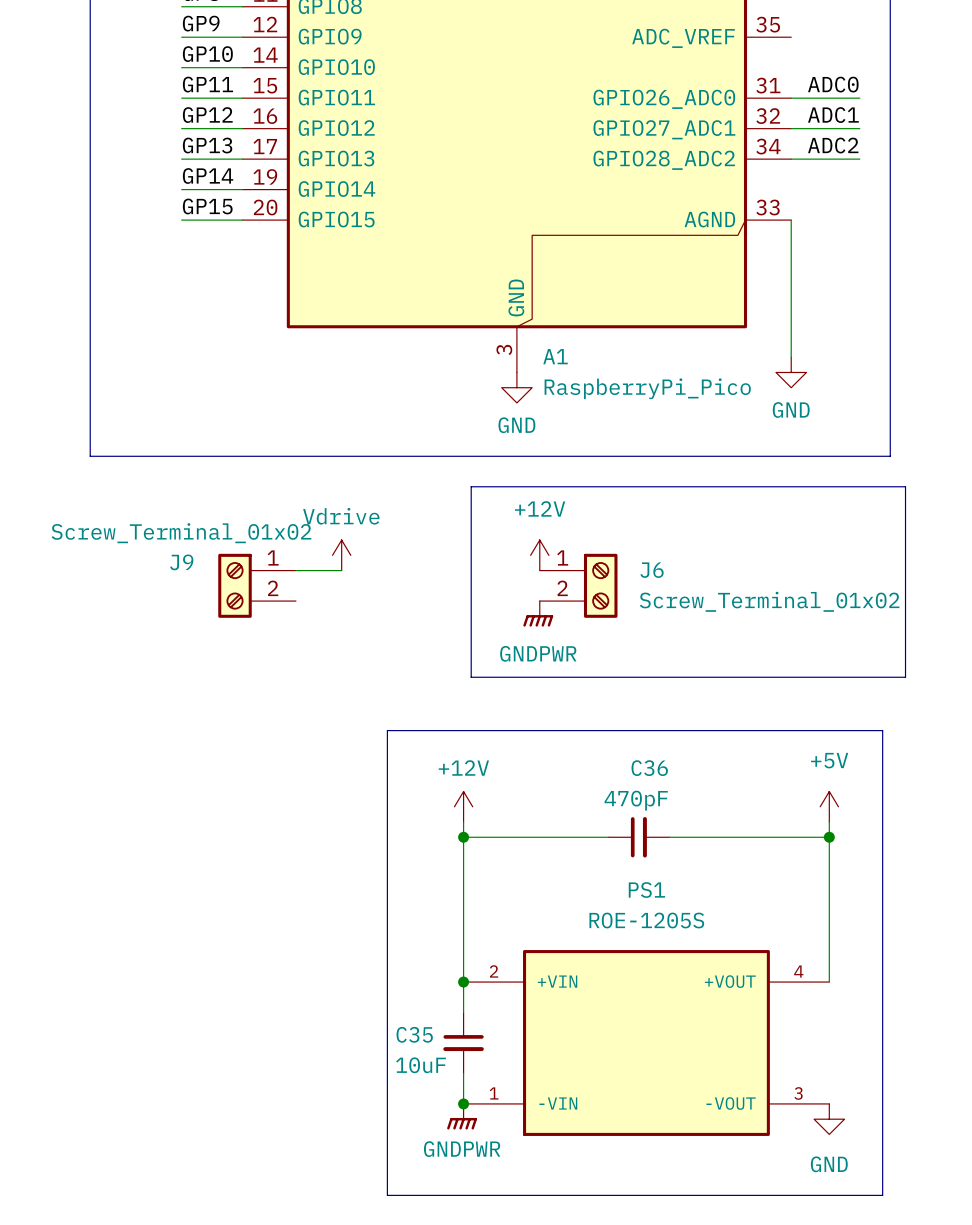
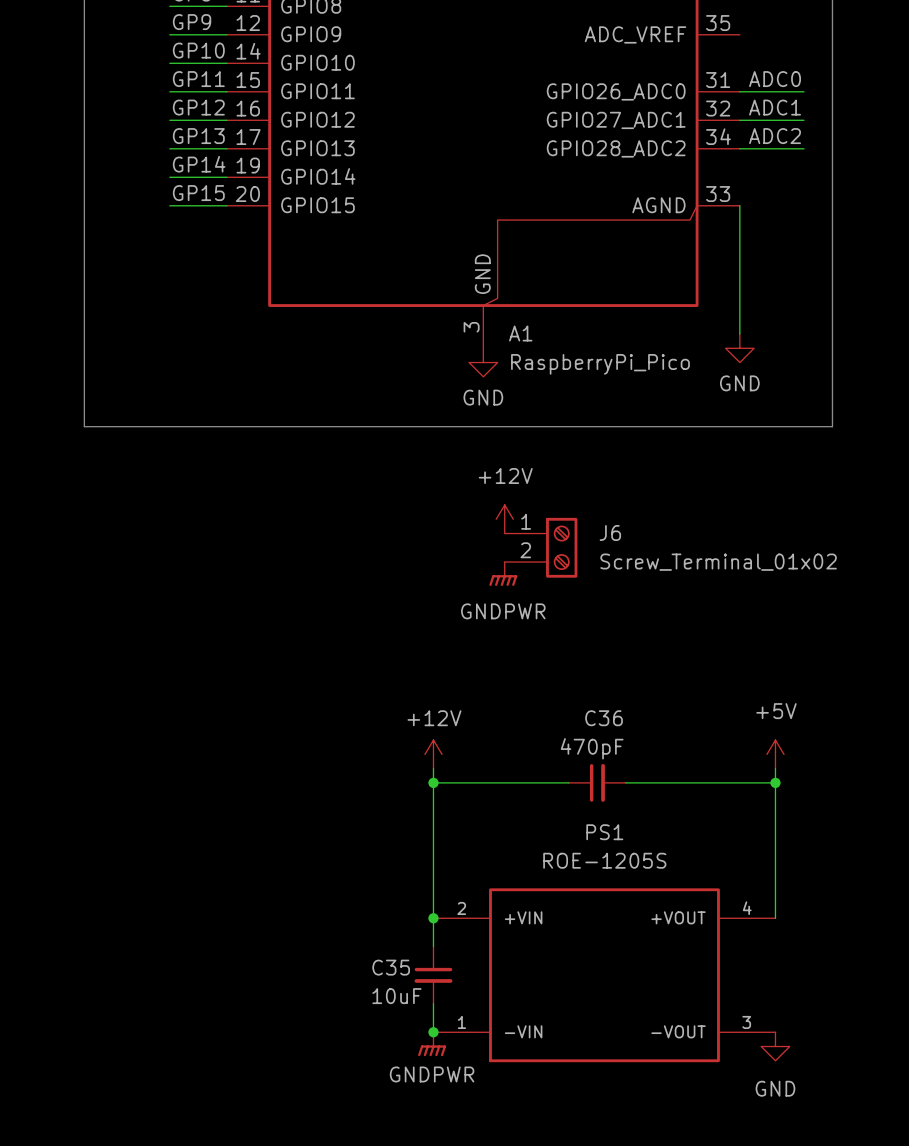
line: (471, 486) (905, 486) (905, 677) (471, 677) (471, 486) -> none
power symbol: Vdrive (341, 555) -> none
wire: (295, 570) (341, 570) -> none
J9: Screw_Terminal_01x02 (257, 585) -> none
line: (387, 730) (882, 730) (882, 1195) (387, 1195) (387, 730) -> none

